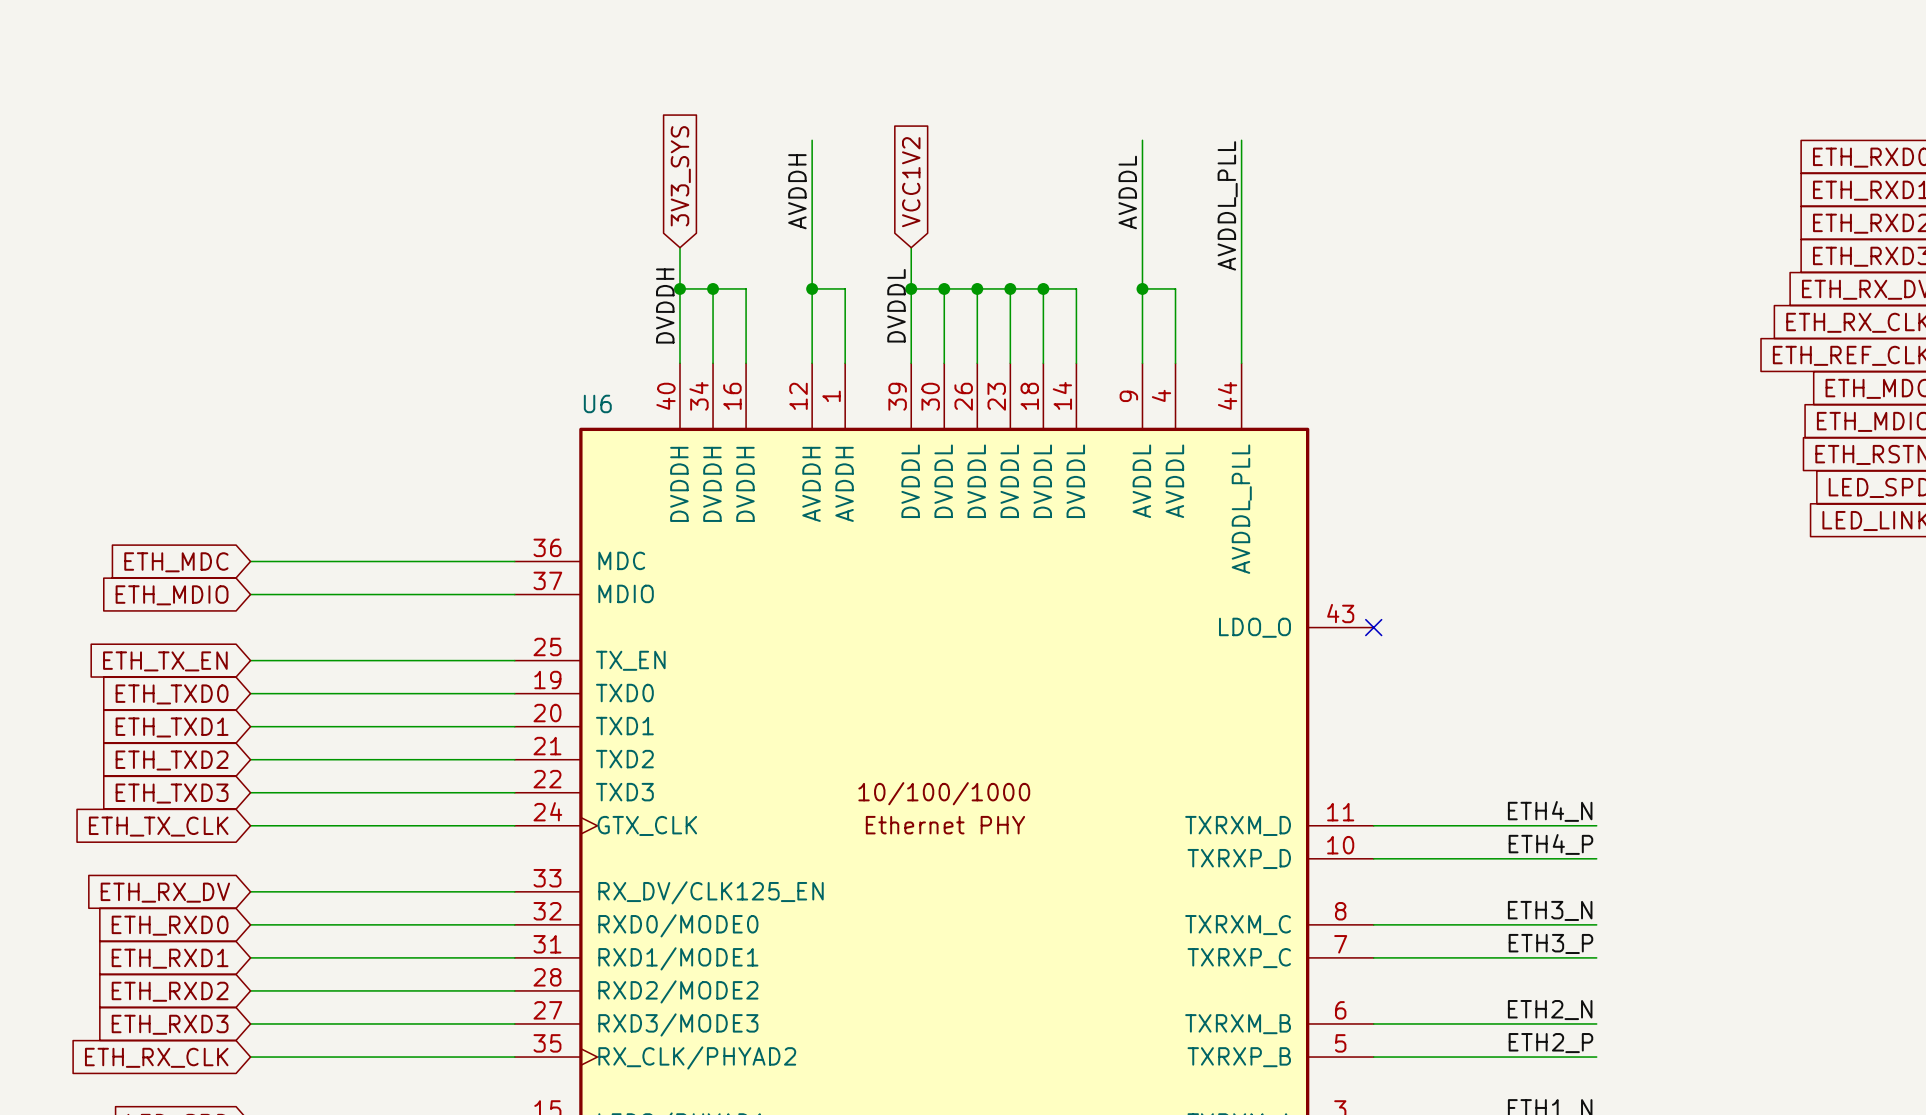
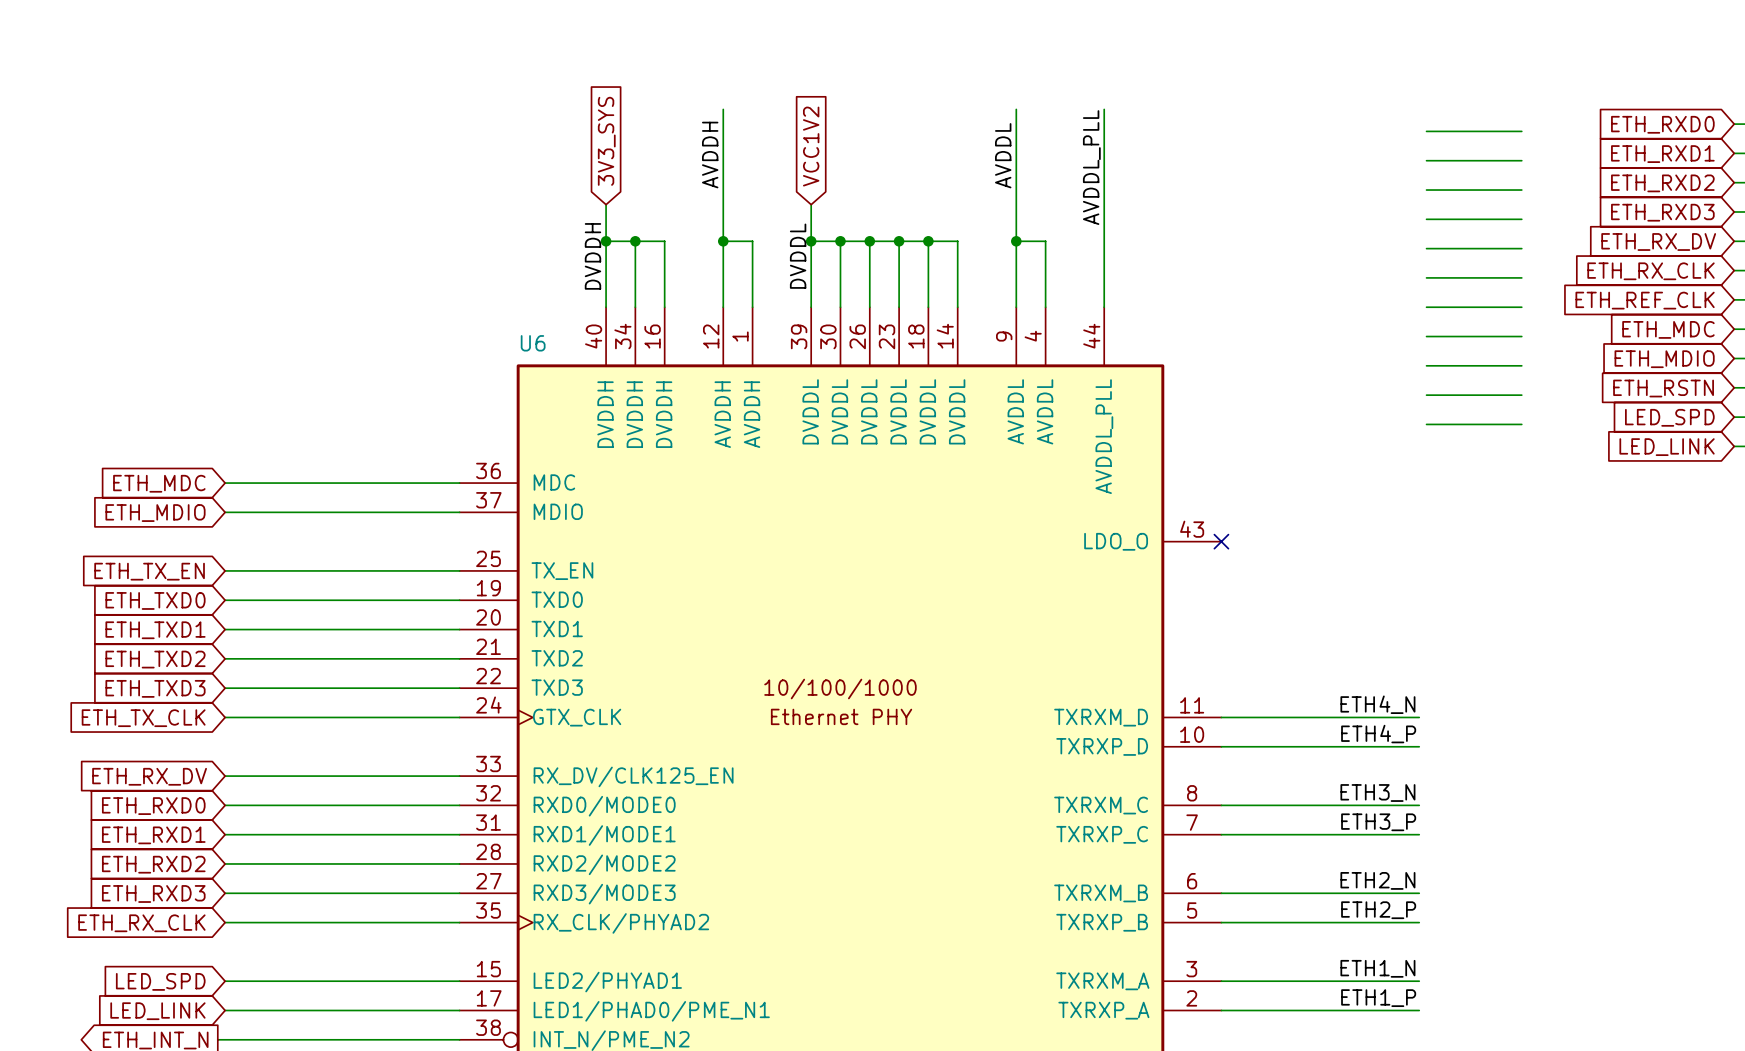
wire: none -> (1426, 131) (1521, 131)
wire: none -> (1426, 160) (1521, 160)
wire: none -> (1426, 190) (1521, 190)
wire: none -> (1426, 219) (1521, 219)
wire: none -> (1426, 248) (1521, 248)
wire: none -> (1426, 277) (1521, 277)
wire: none -> (1426, 307) (1521, 307)
wire: none -> (1426, 336) (1521, 336)
wire: none -> (1426, 365) (1521, 365)
wire: none -> (1426, 395) (1521, 395)
wire: none -> (1426, 424) (1521, 424)

